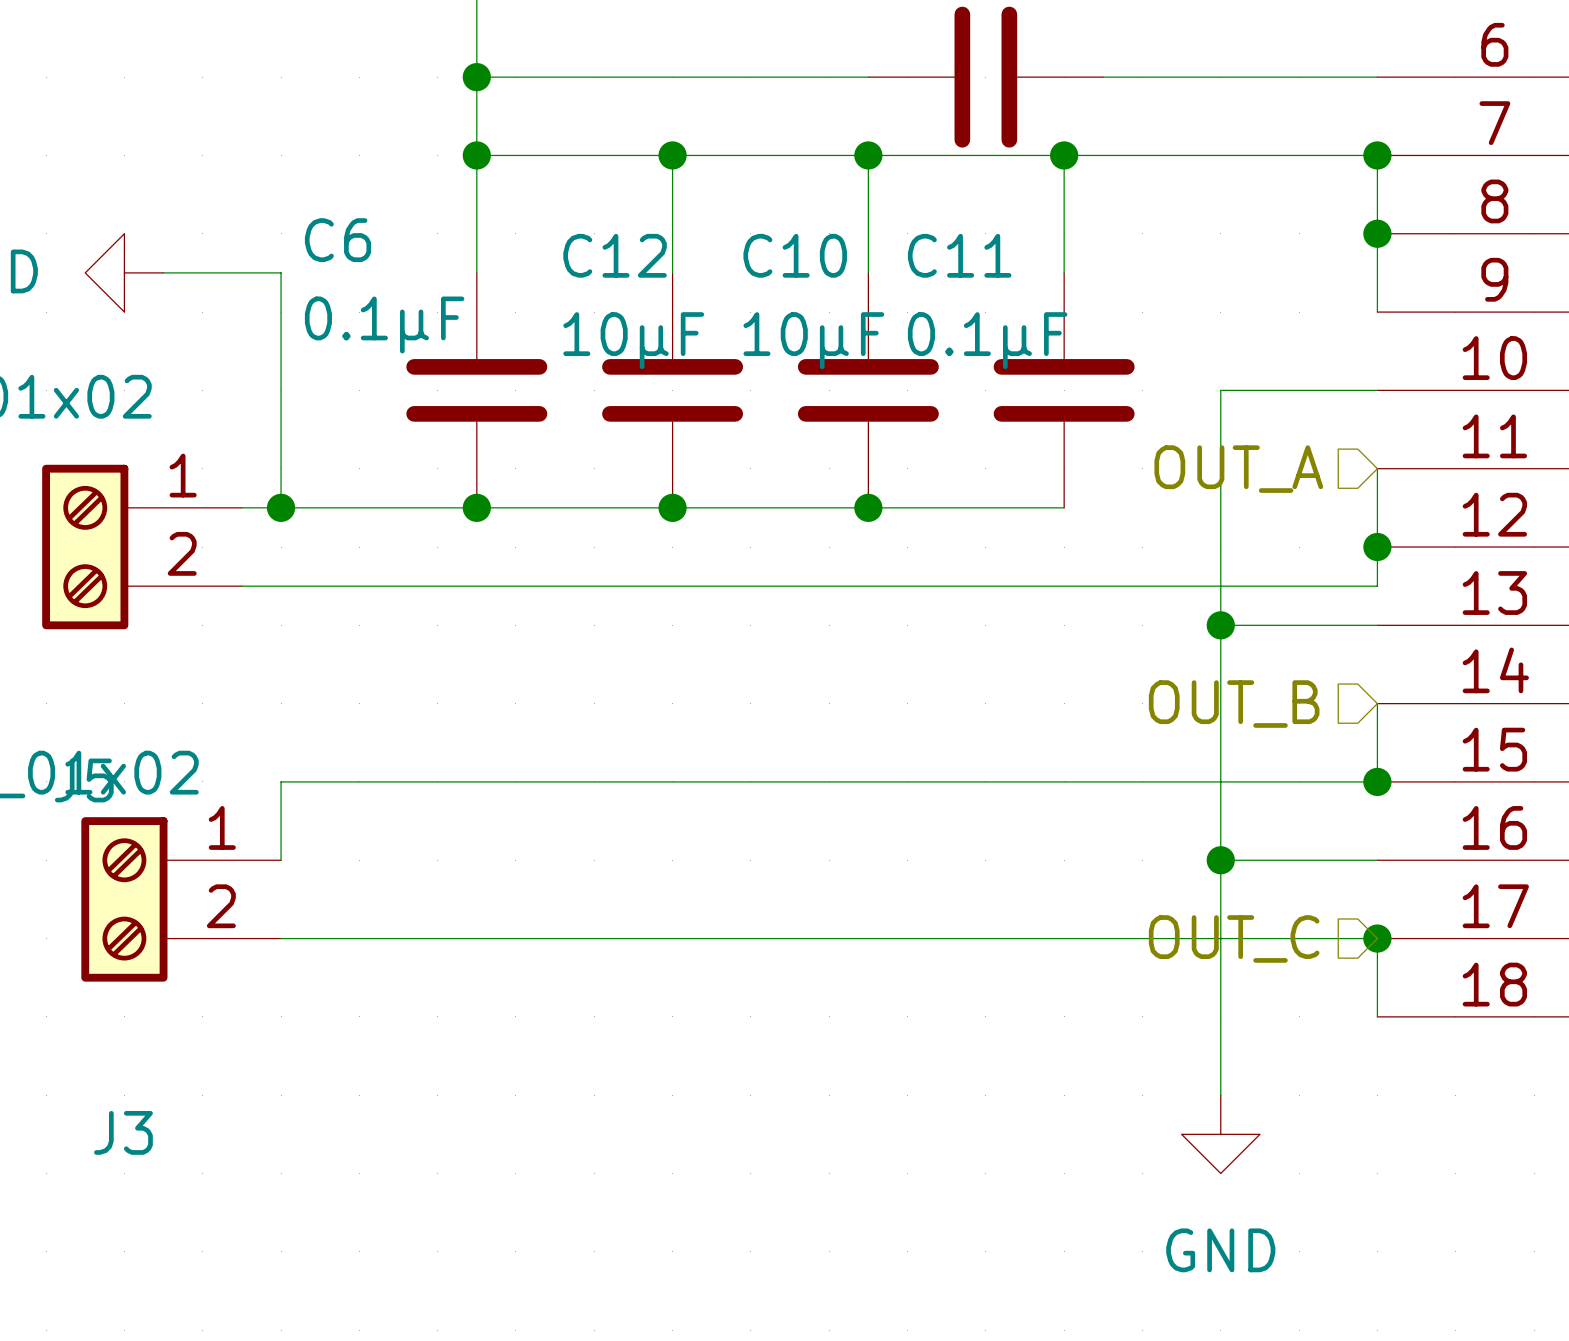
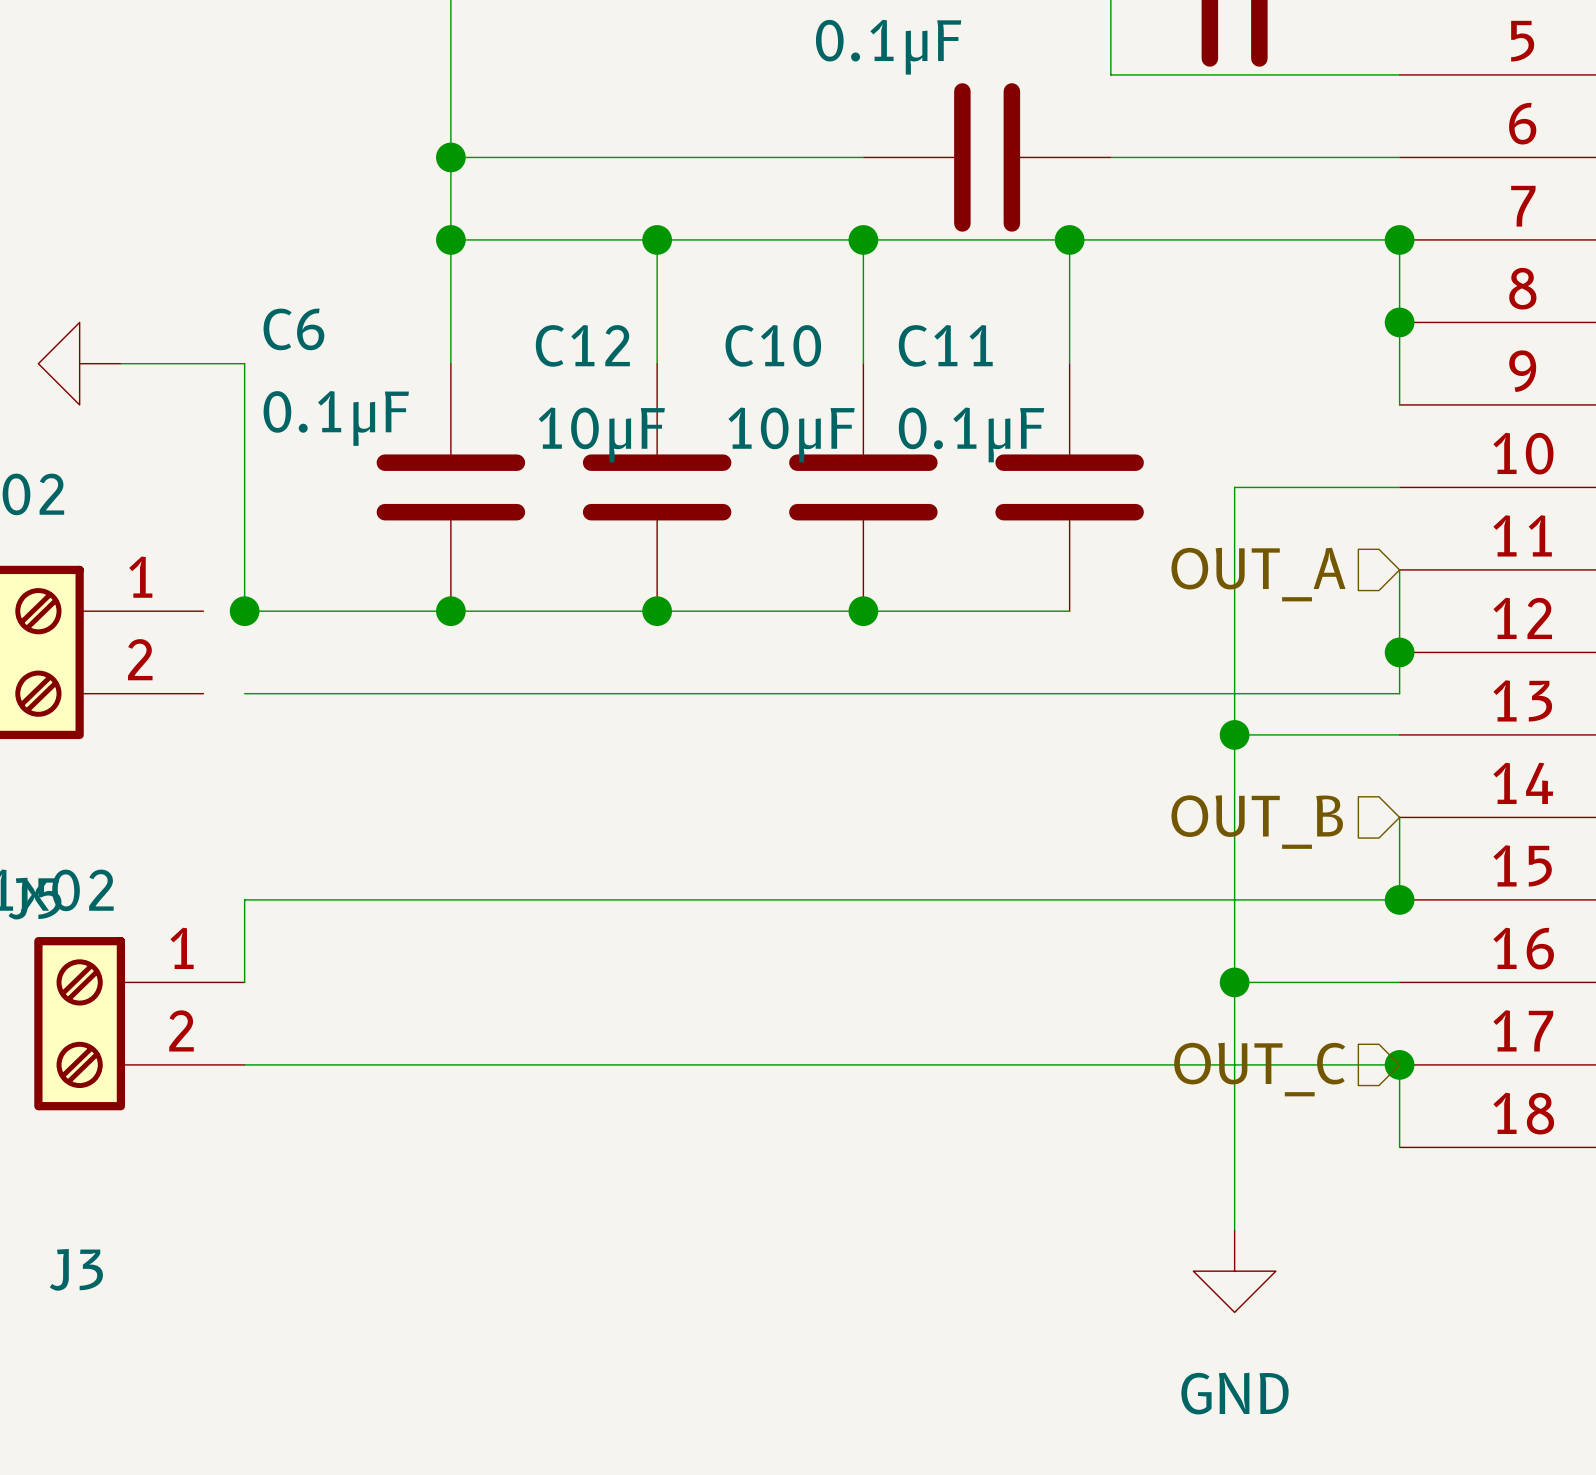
wire: (241, 507) (281, 507) -> none
wire: (241, 586) (281, 586) -> none

